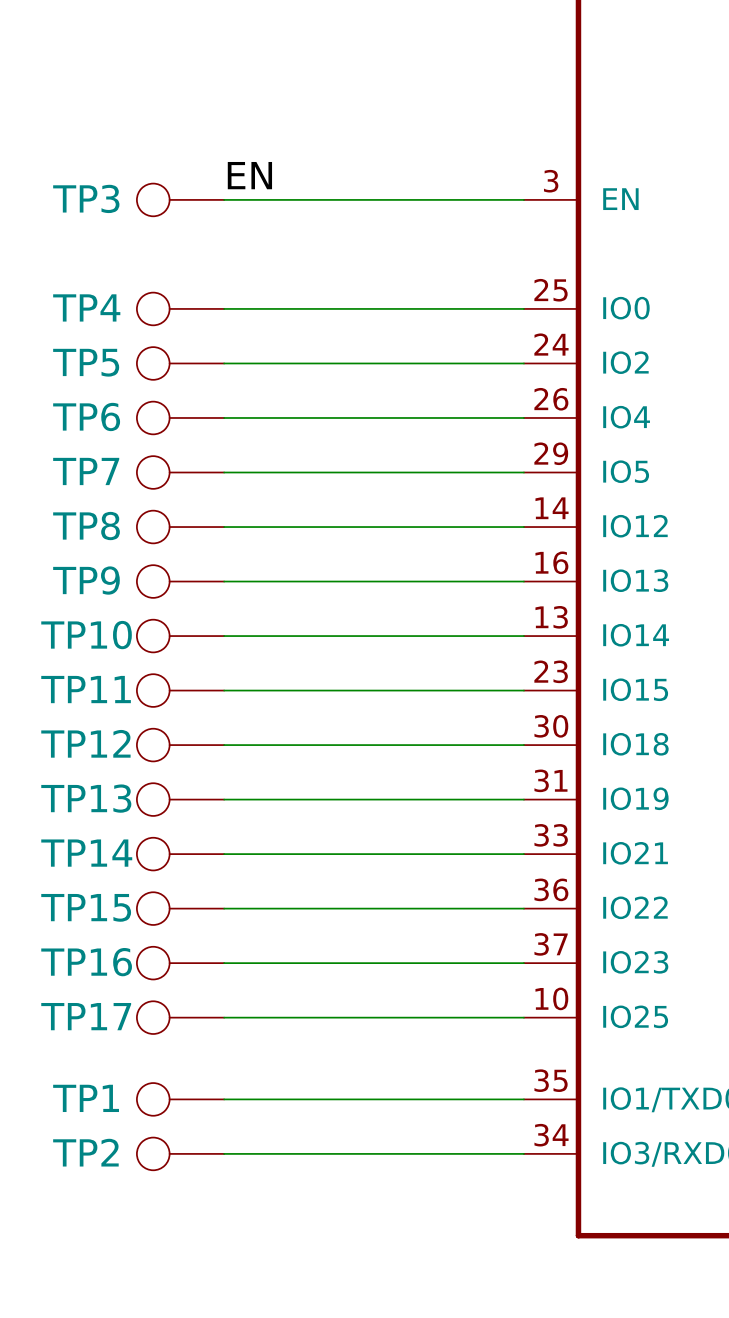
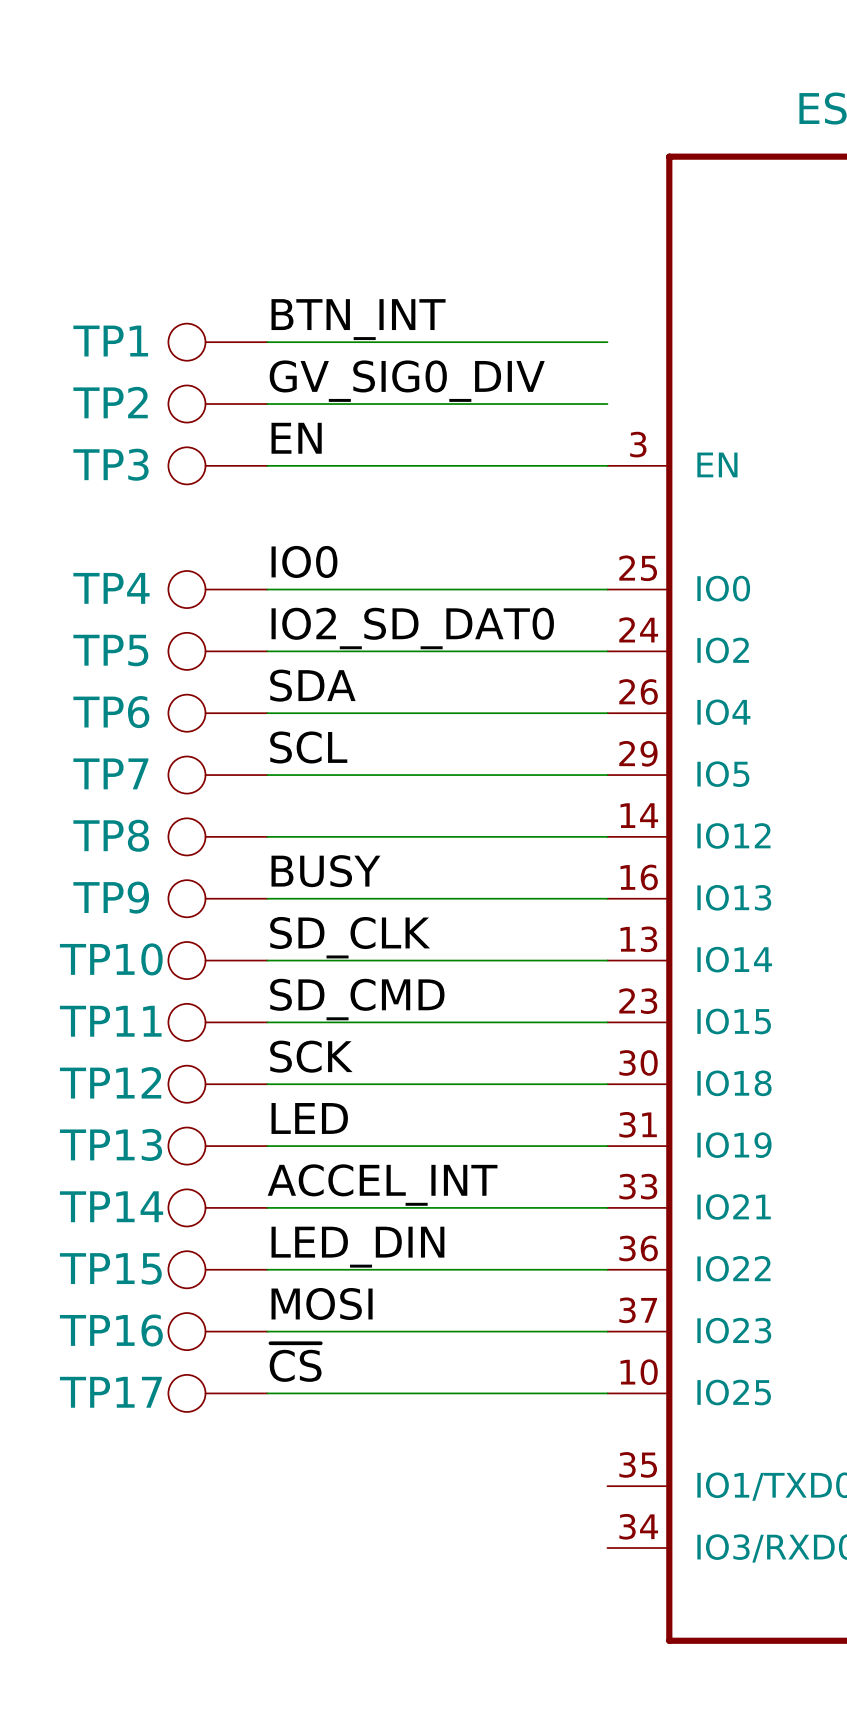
label: none -> BTN_INT (358, 319)
wire: none -> (267, 342) (607, 342)
label: none -> GV_SIG0_DIV (407, 381)
wire: none -> (267, 404) (607, 404)
label: none -> IO0 (304, 561)
label: none -> IO2_SD_DAT0 (412, 628)
label: none -> SDA (312, 685)
label: none -> SCL (308, 747)
label: none -> BUSY (325, 871)
label: none -> SD_CLK (350, 937)
label: none -> SD_CMD (357, 999)
label: none -> SCK (311, 1056)
label: none -> LED (309, 1118)
label: none -> ACCEL_INT (382, 1185)
label: none -> LED_DIN (357, 1247)
label: none -> MOSI (322, 1304)
label: none -> ~{CS} (295, 1362)
TP1 position: (180, 1099) -> (217, 342)
wire: (224, 1099) (523, 1099) -> none
TP2 position: (180, 1153) -> (217, 404)
wire: (224, 1153) (523, 1153) -> none

